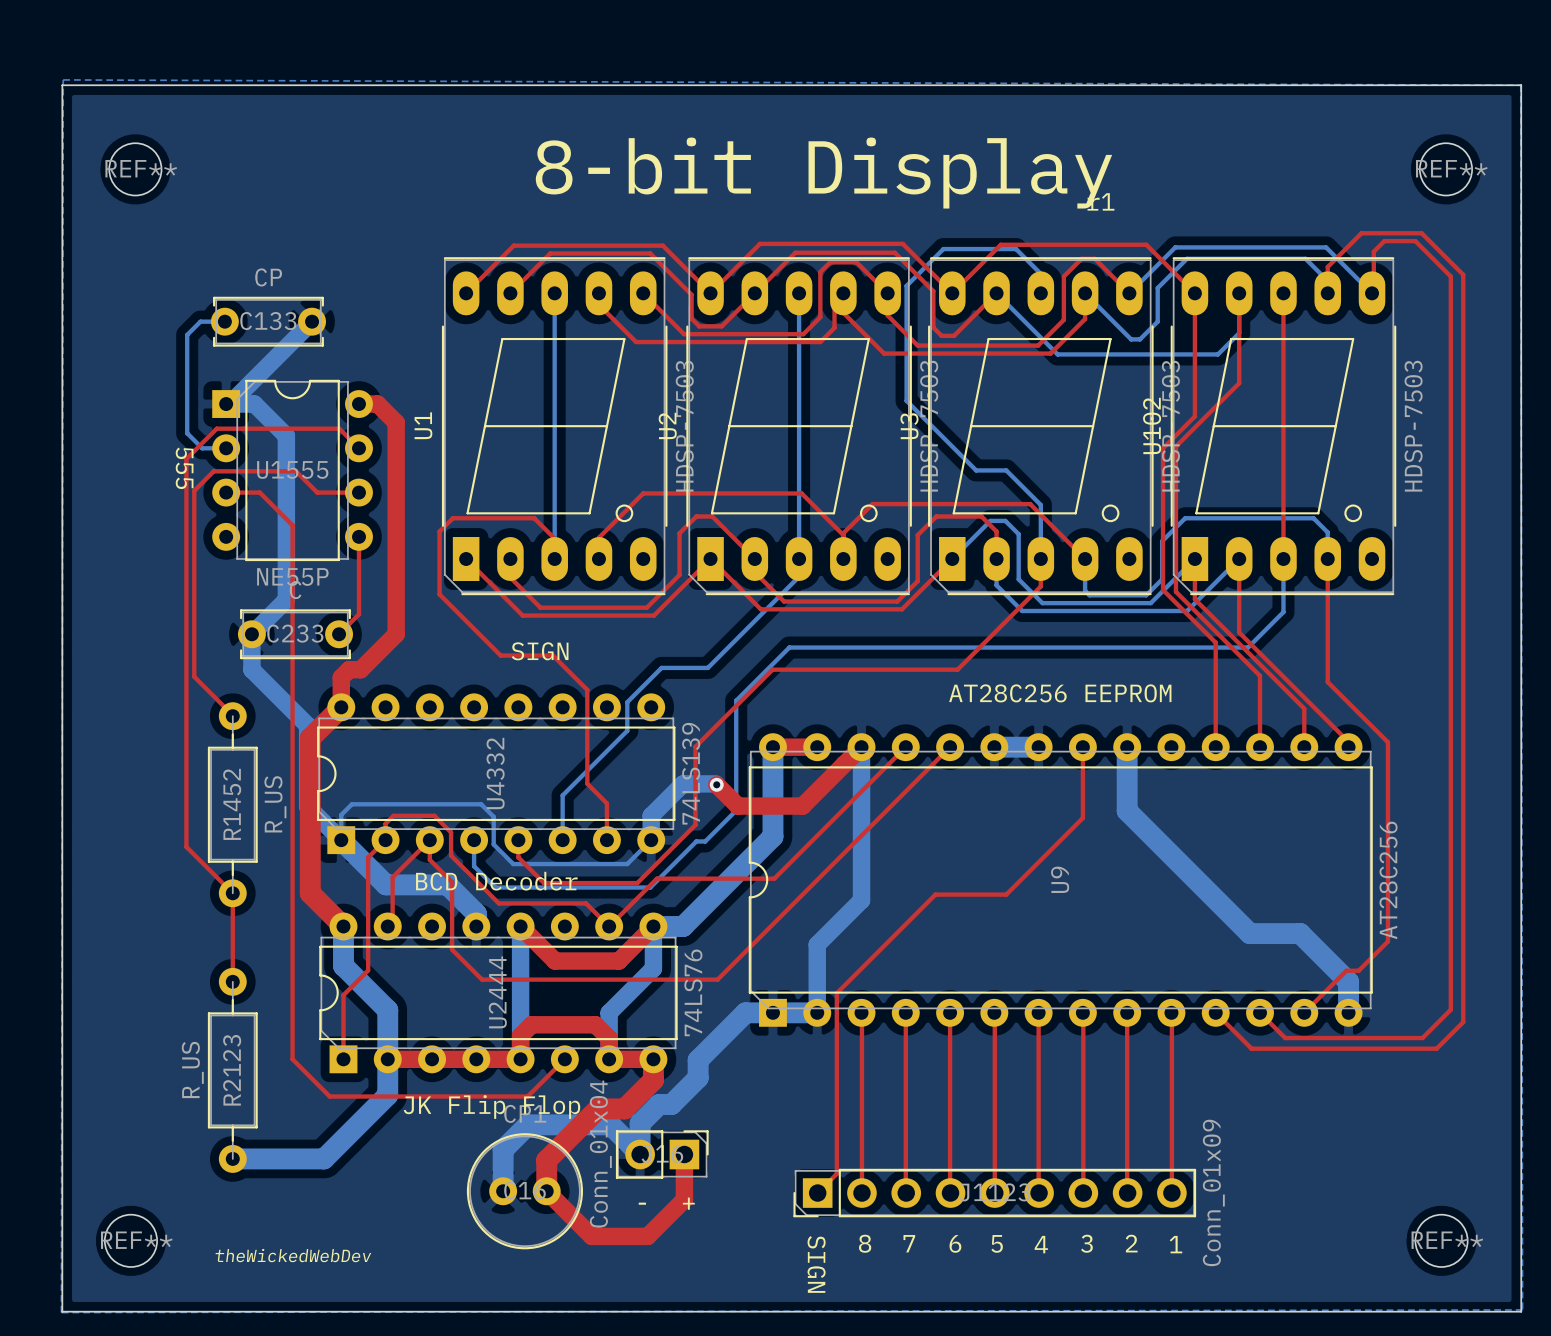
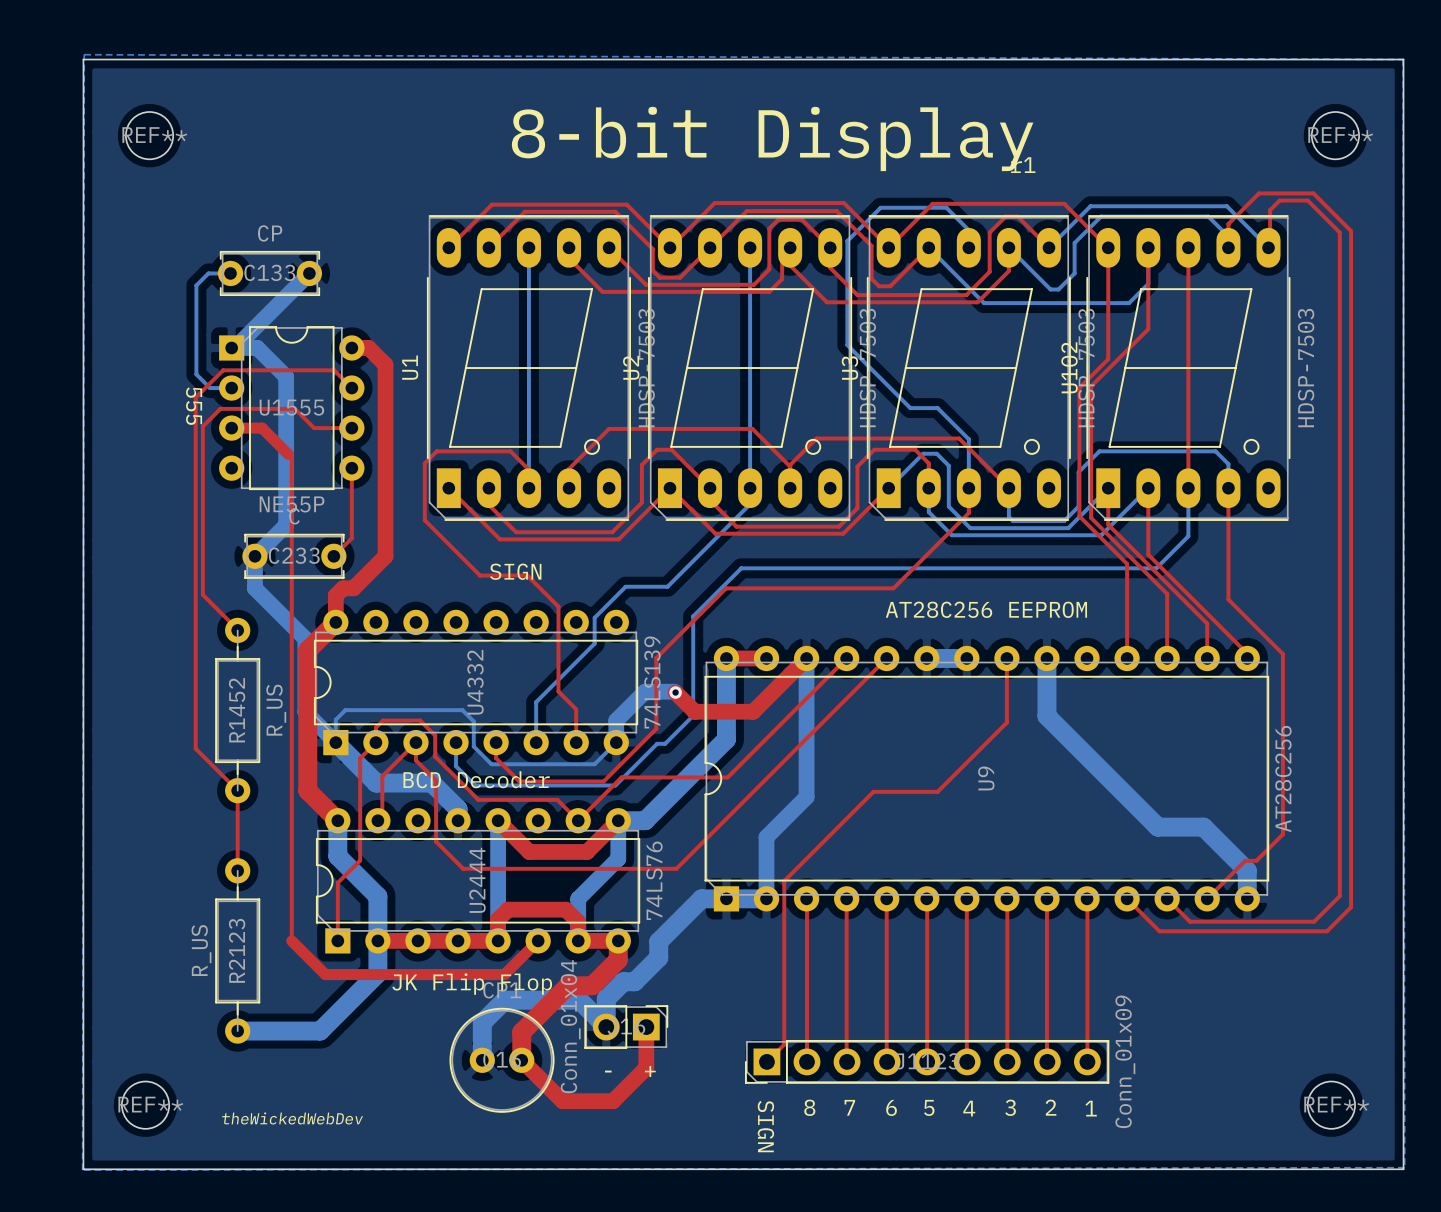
top track width: thin (226, 492) (259, 492) (288, 521) -> thick (231, 428) (262, 428) (288, 454)
top track width: thin (292, 1059) (329, 1096) (527, 1096) (564, 1059) -> thick (291, 940) (325, 974) (504, 974) (538, 940)

